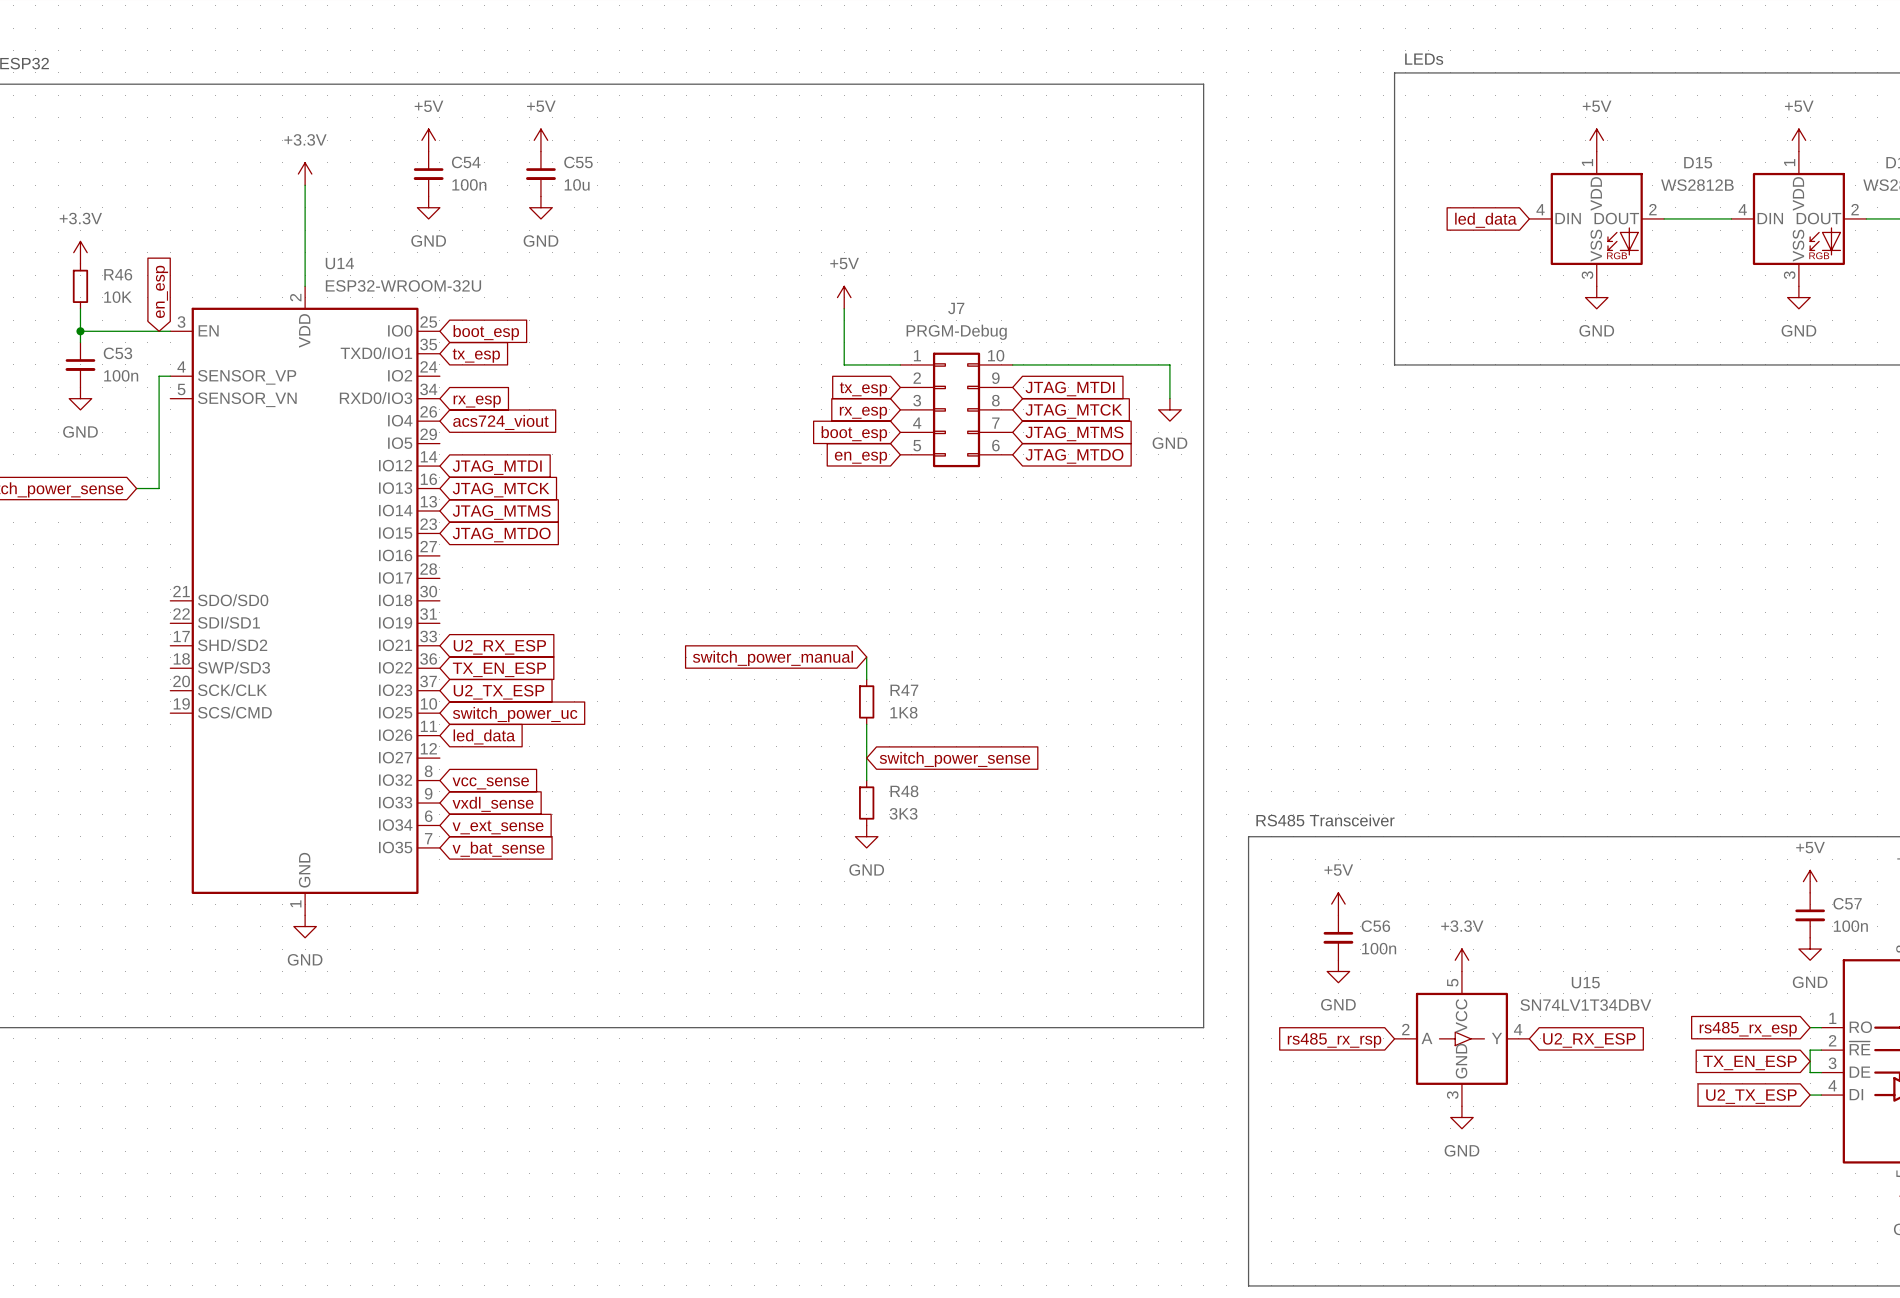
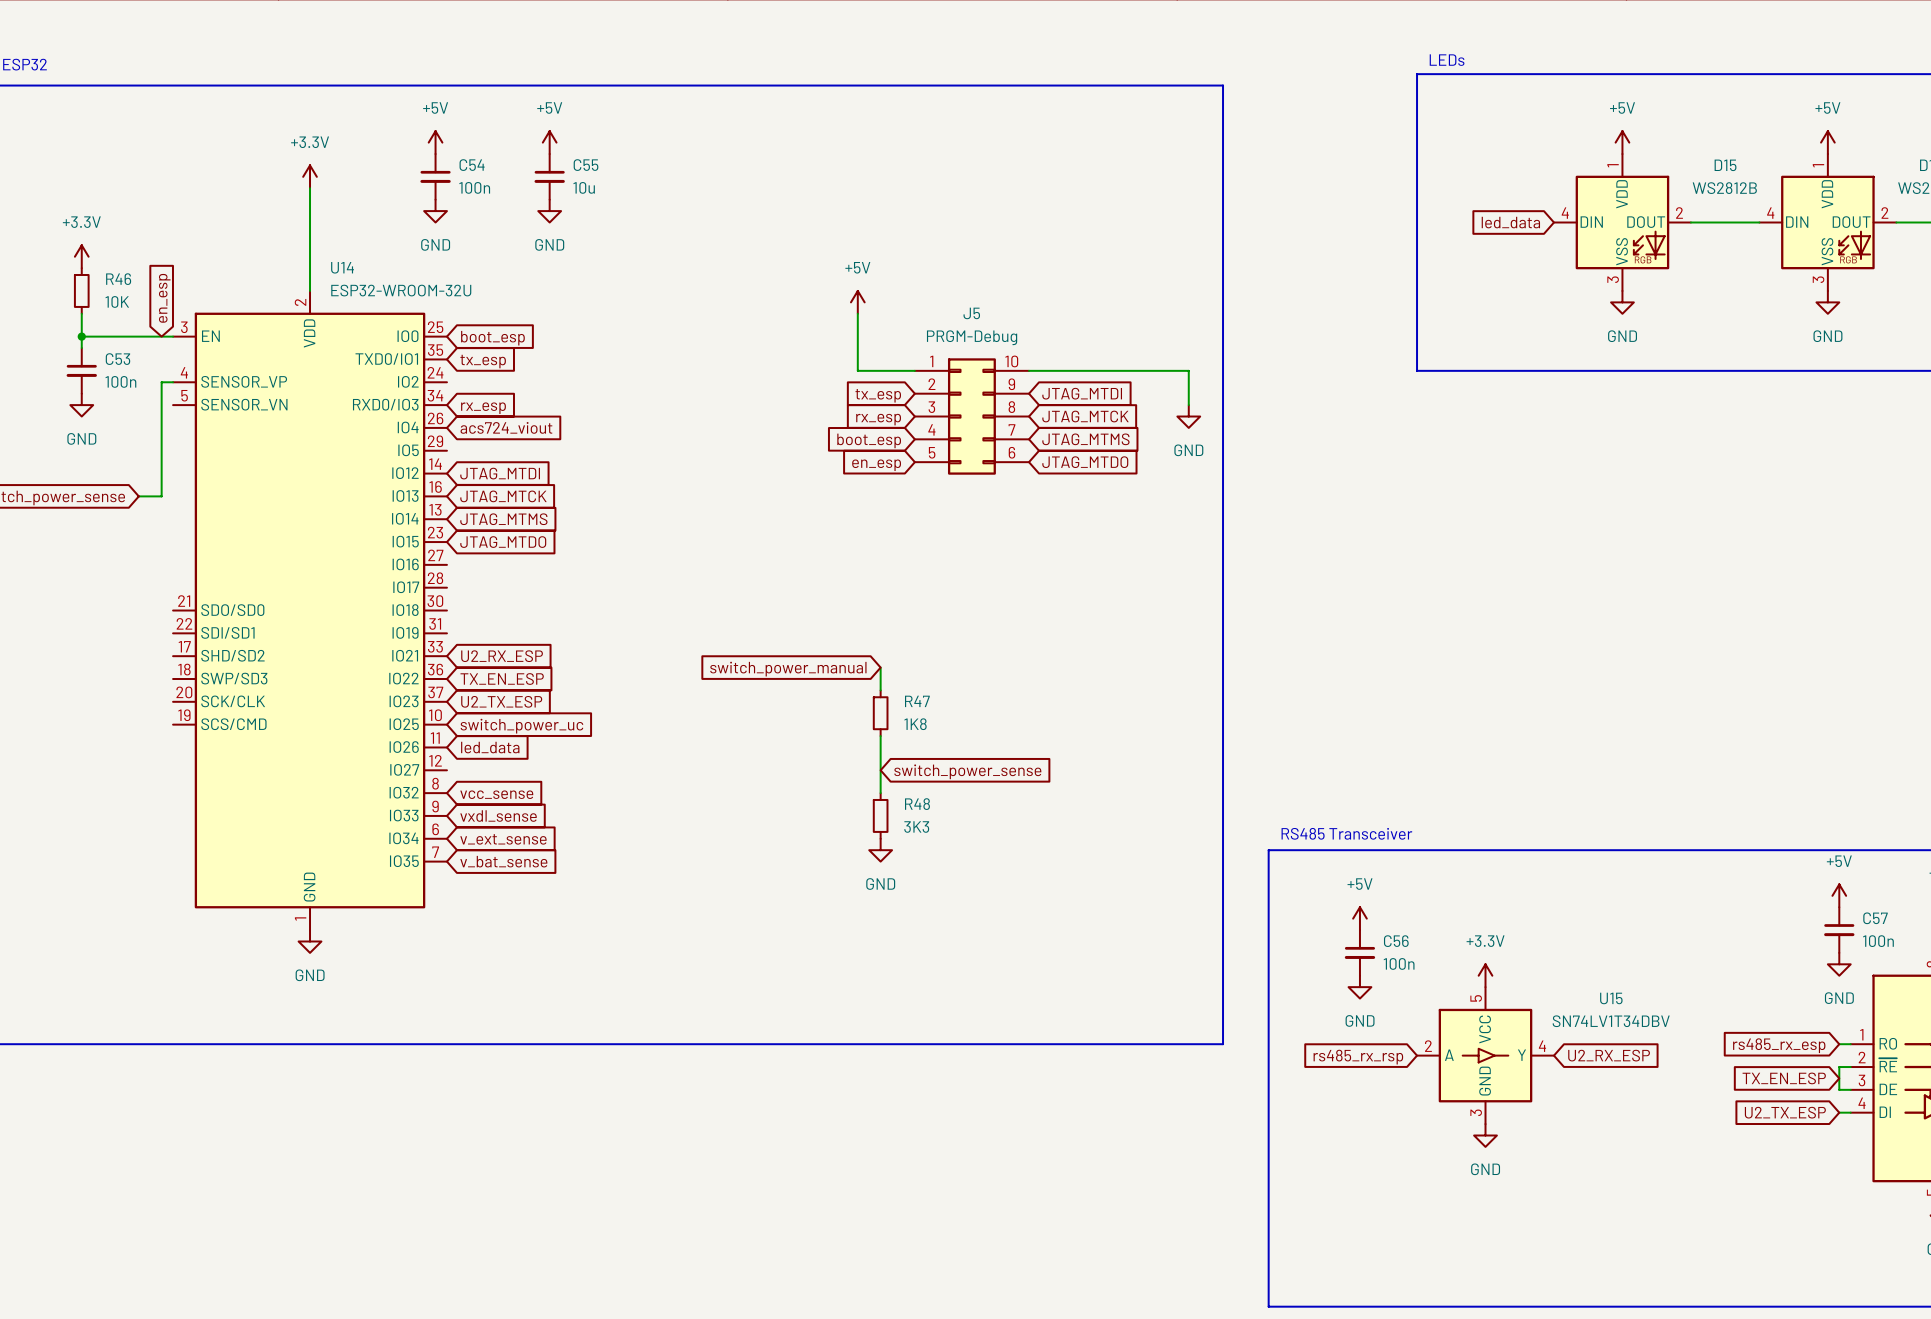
J7 name: J7 (956, 308) -> J5 (971, 313)

